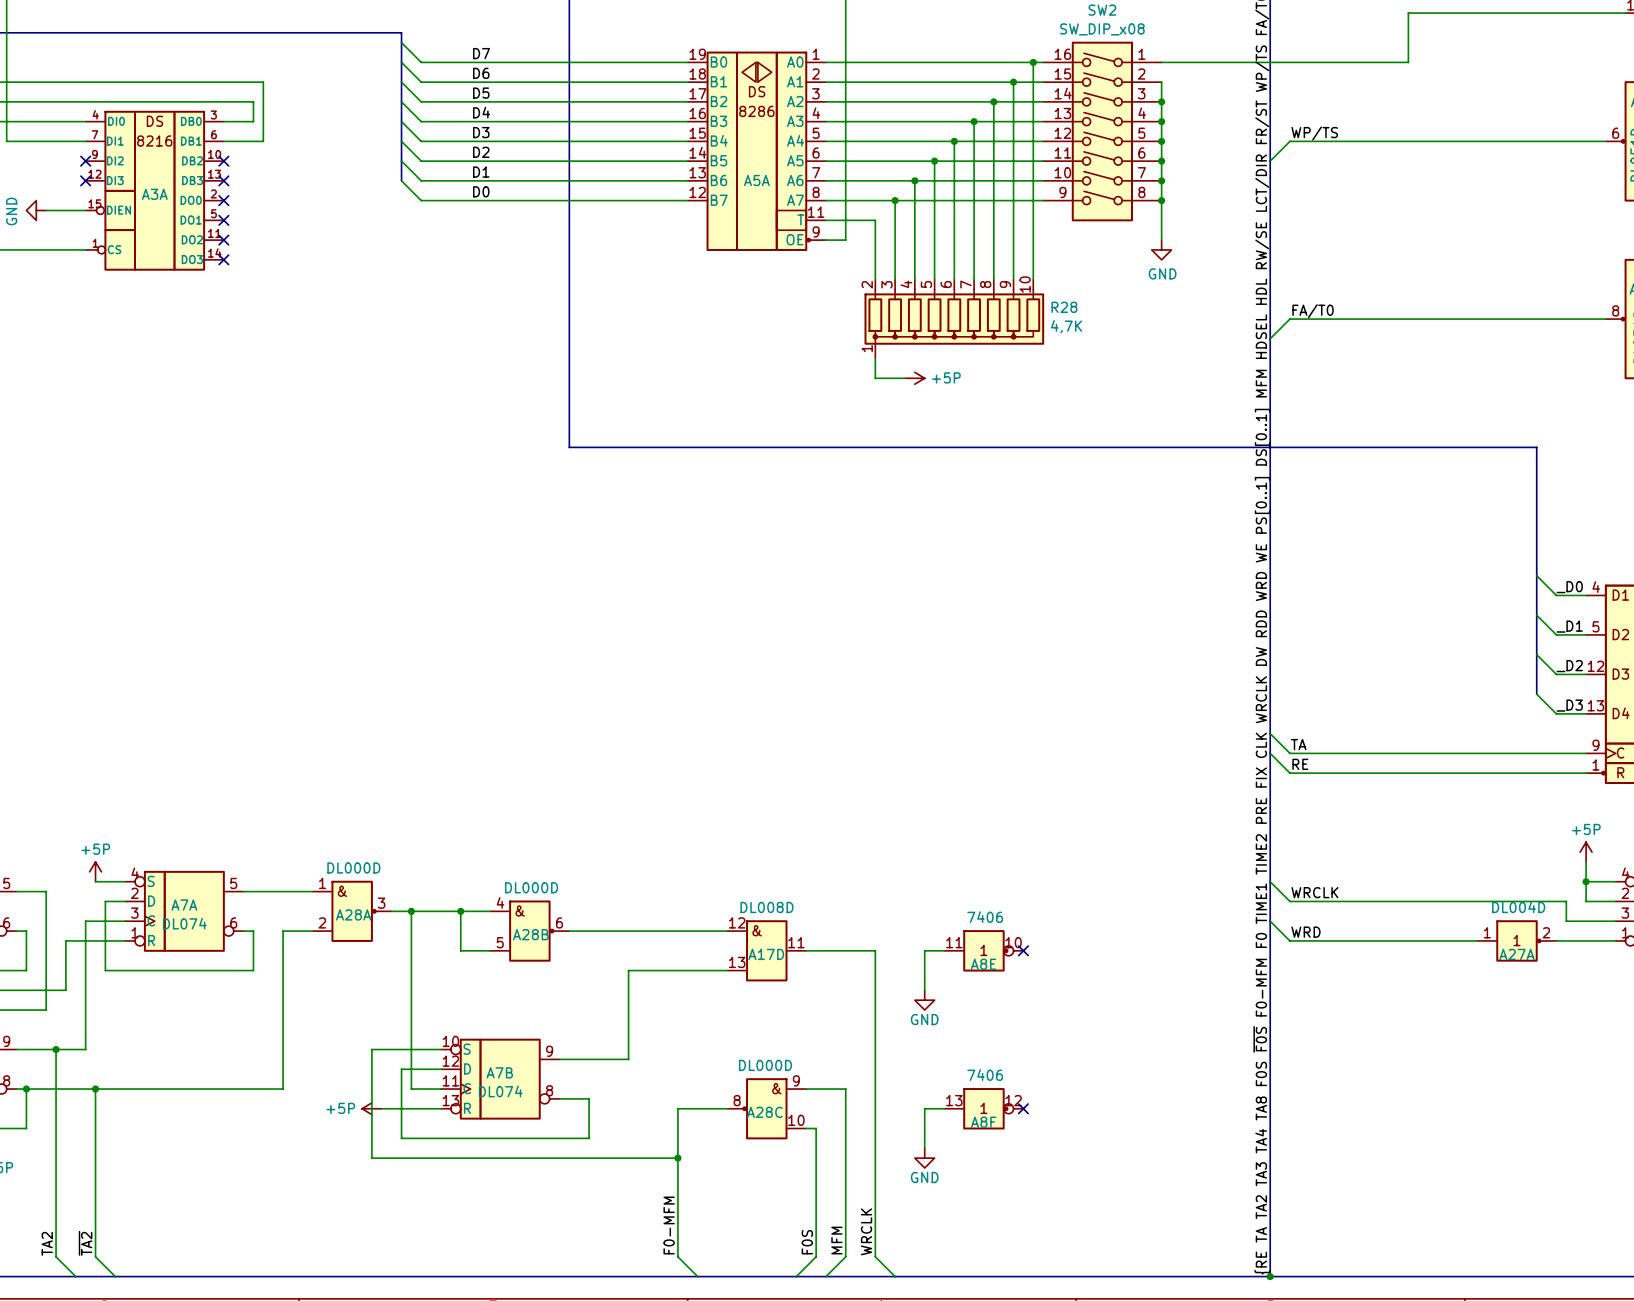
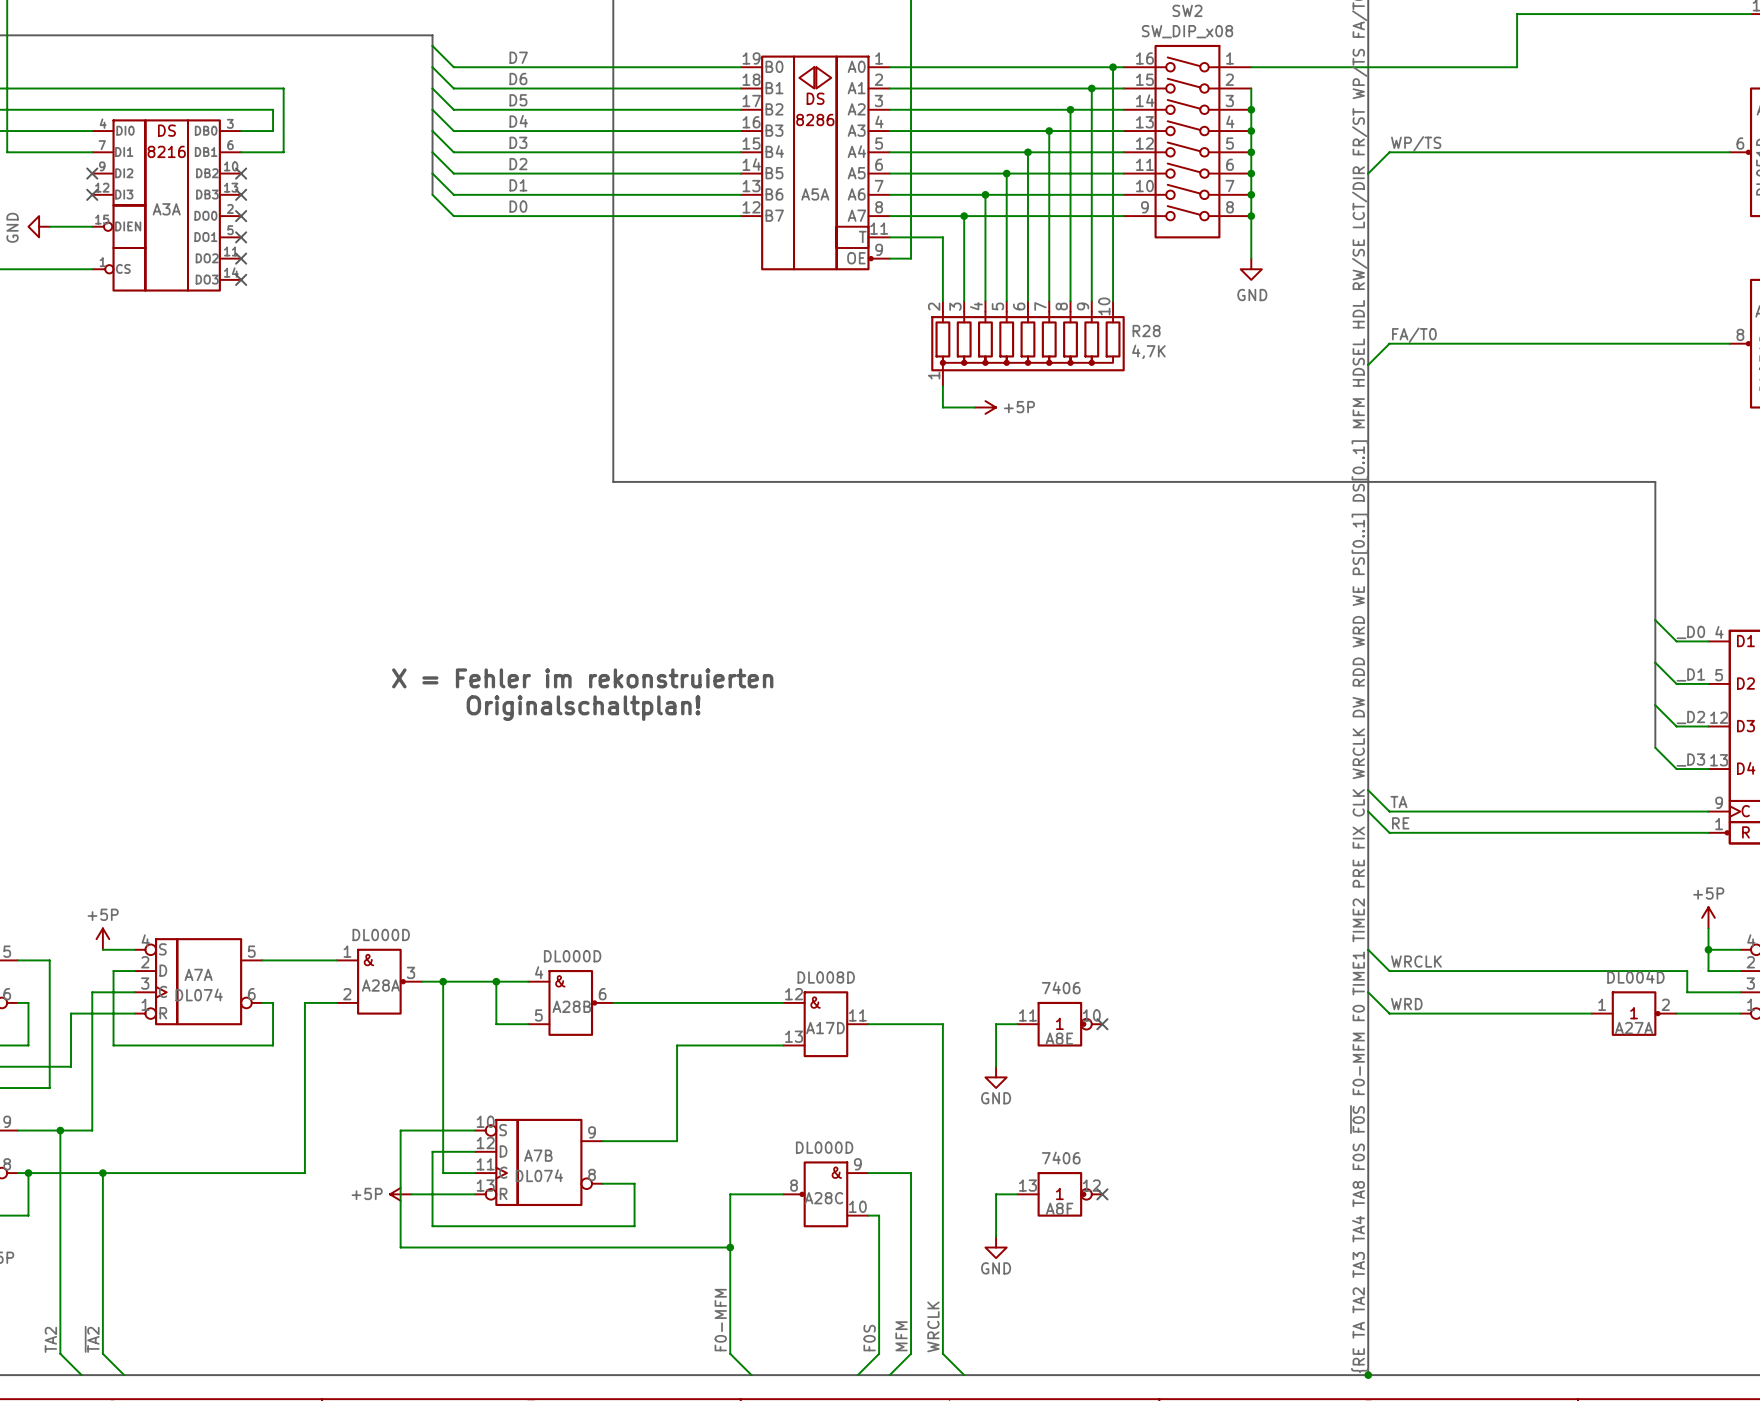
text: none -> X = Fehler im rekonstruierten (582, 678)
text: none -> Originalschaltplan! (583, 708)

